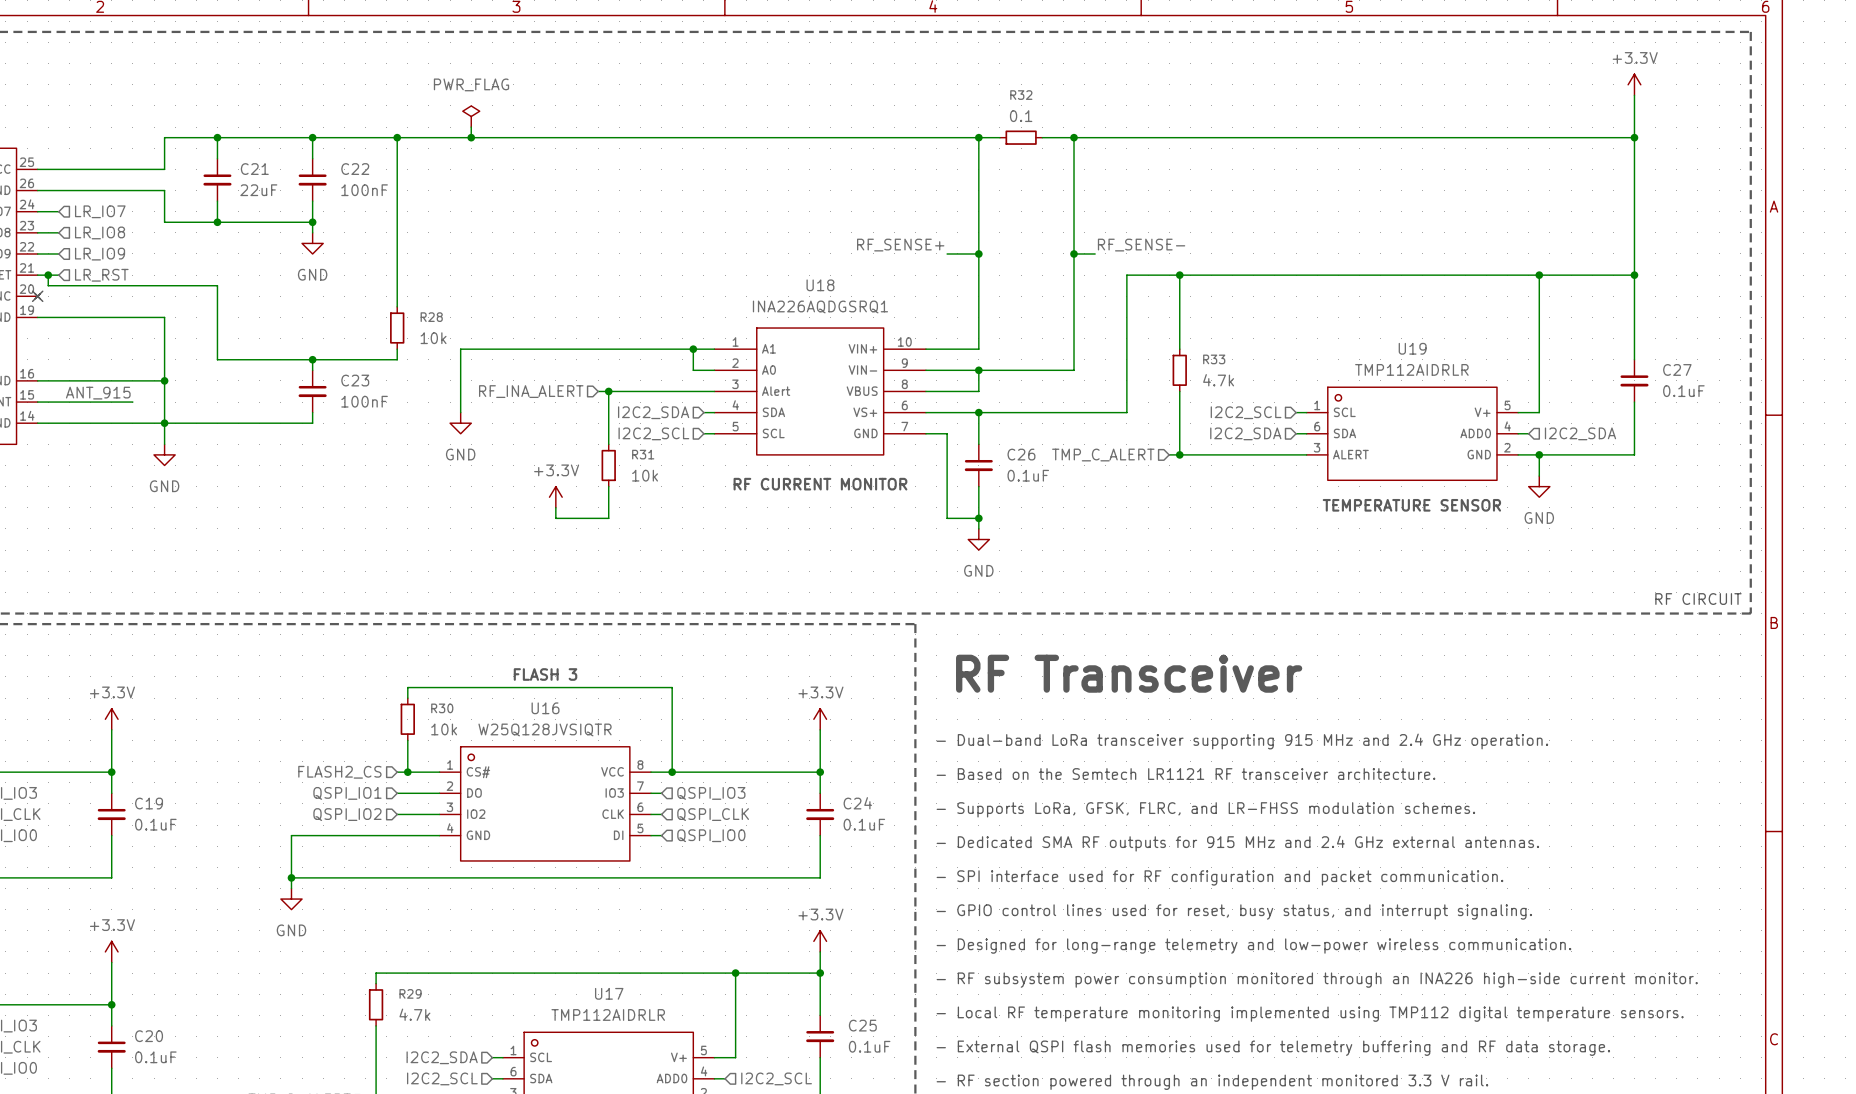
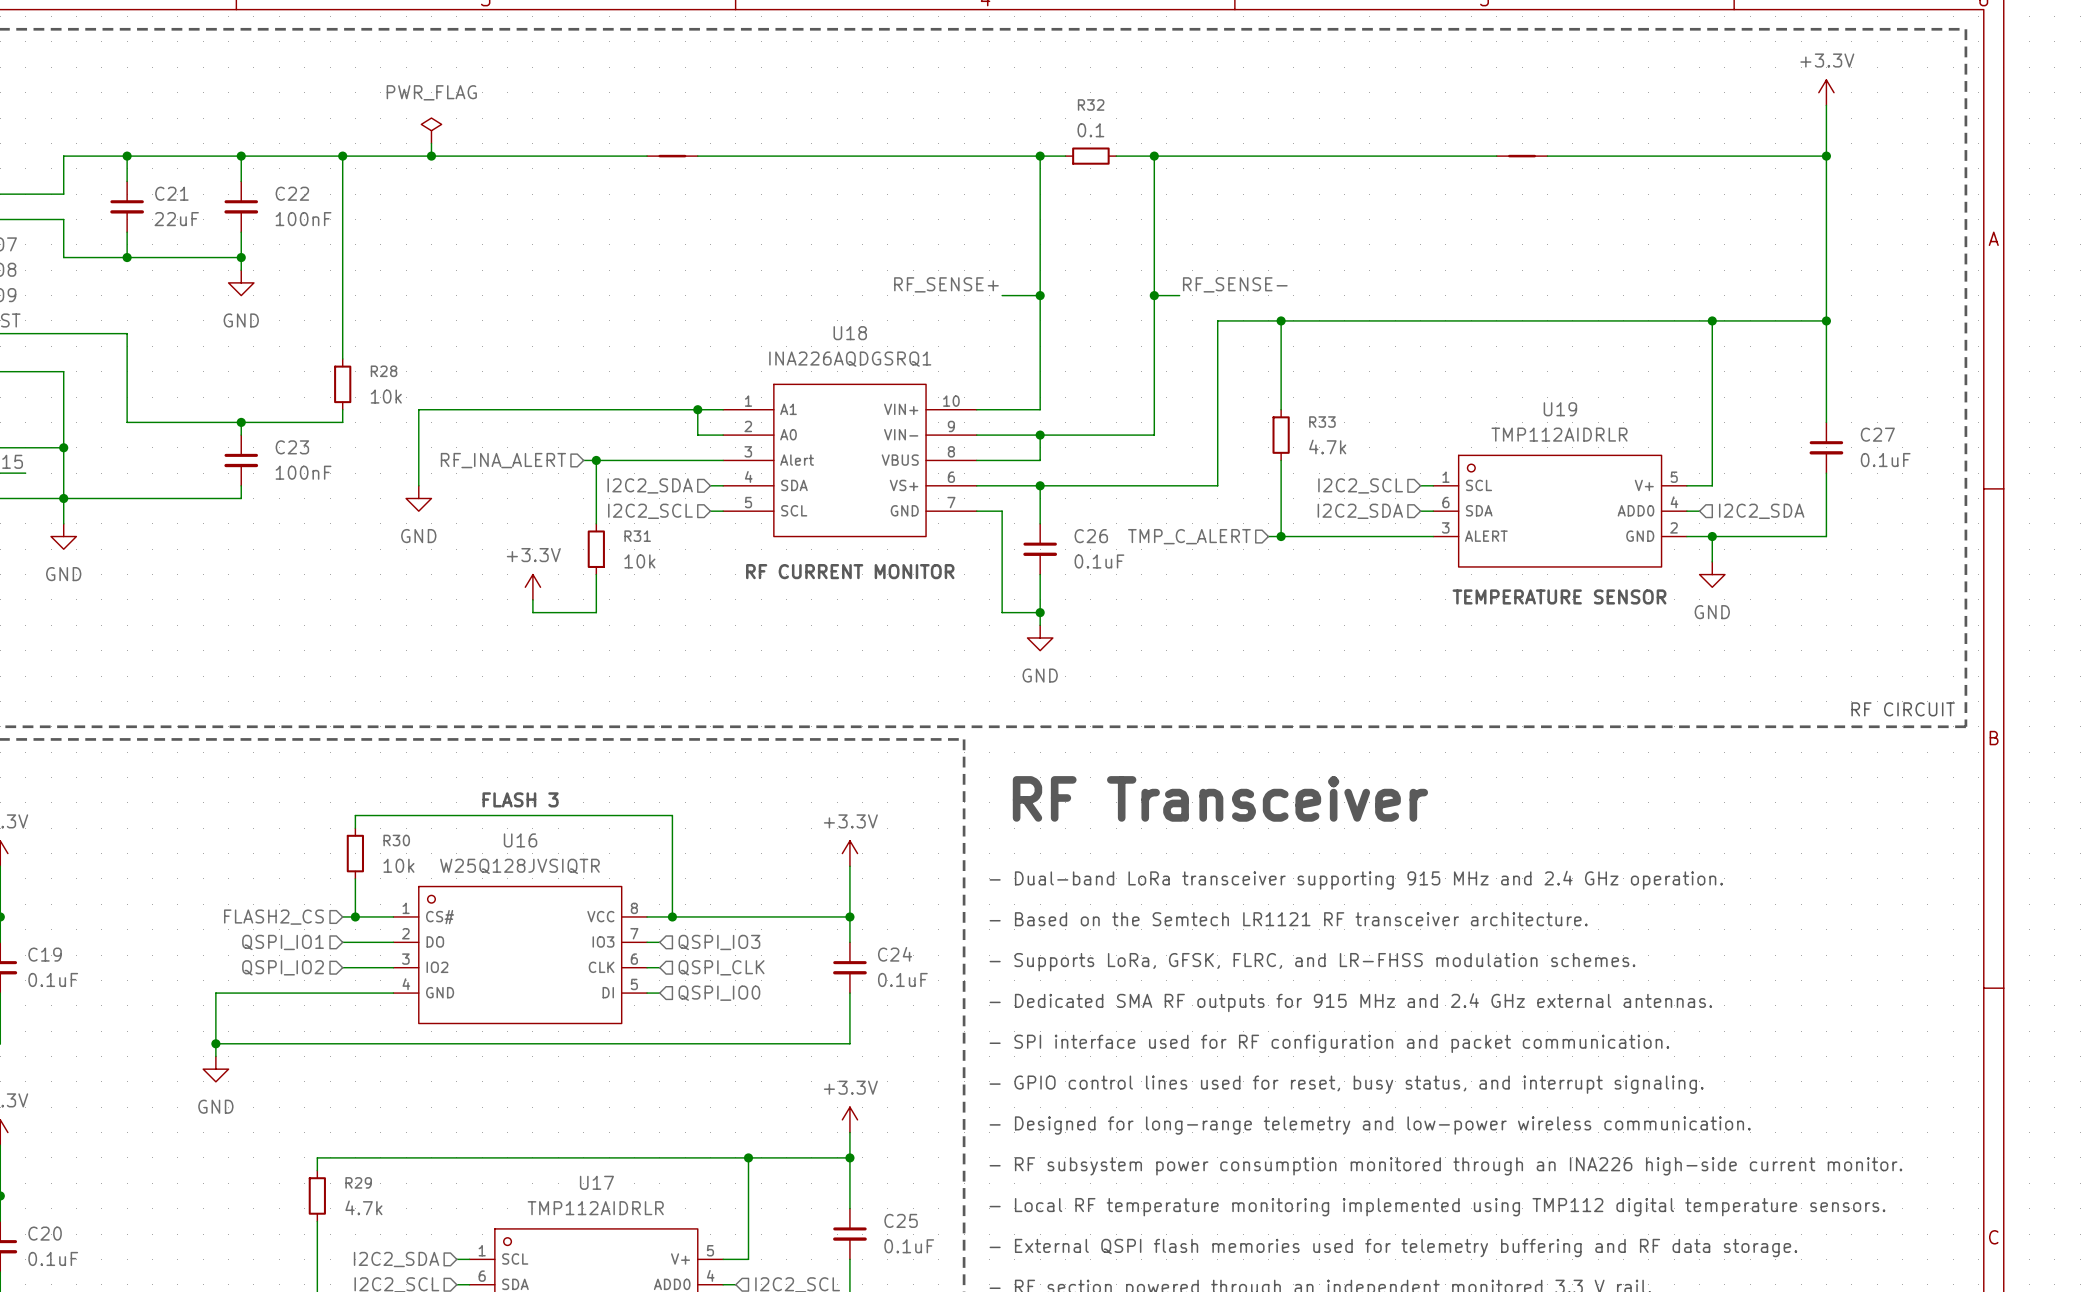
part: none -> (672, 156)
part: none -> (1522, 156)

